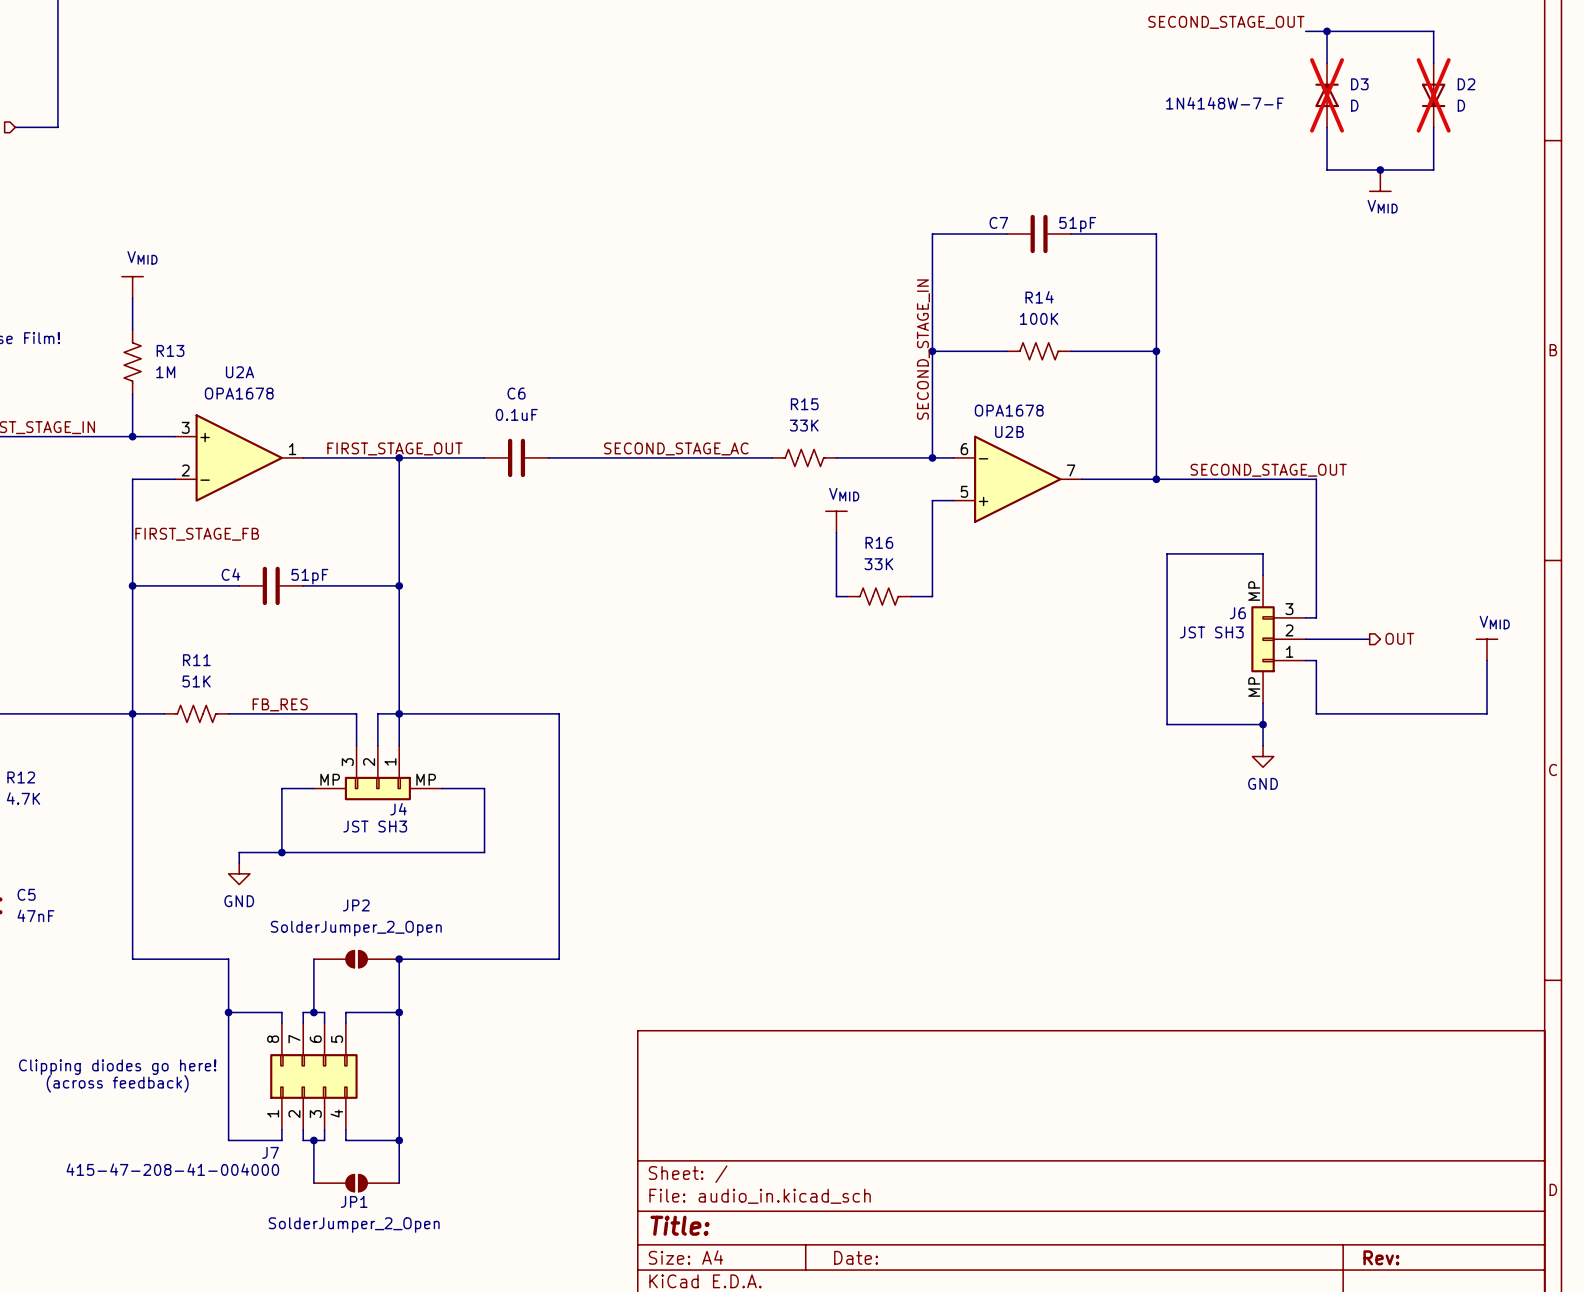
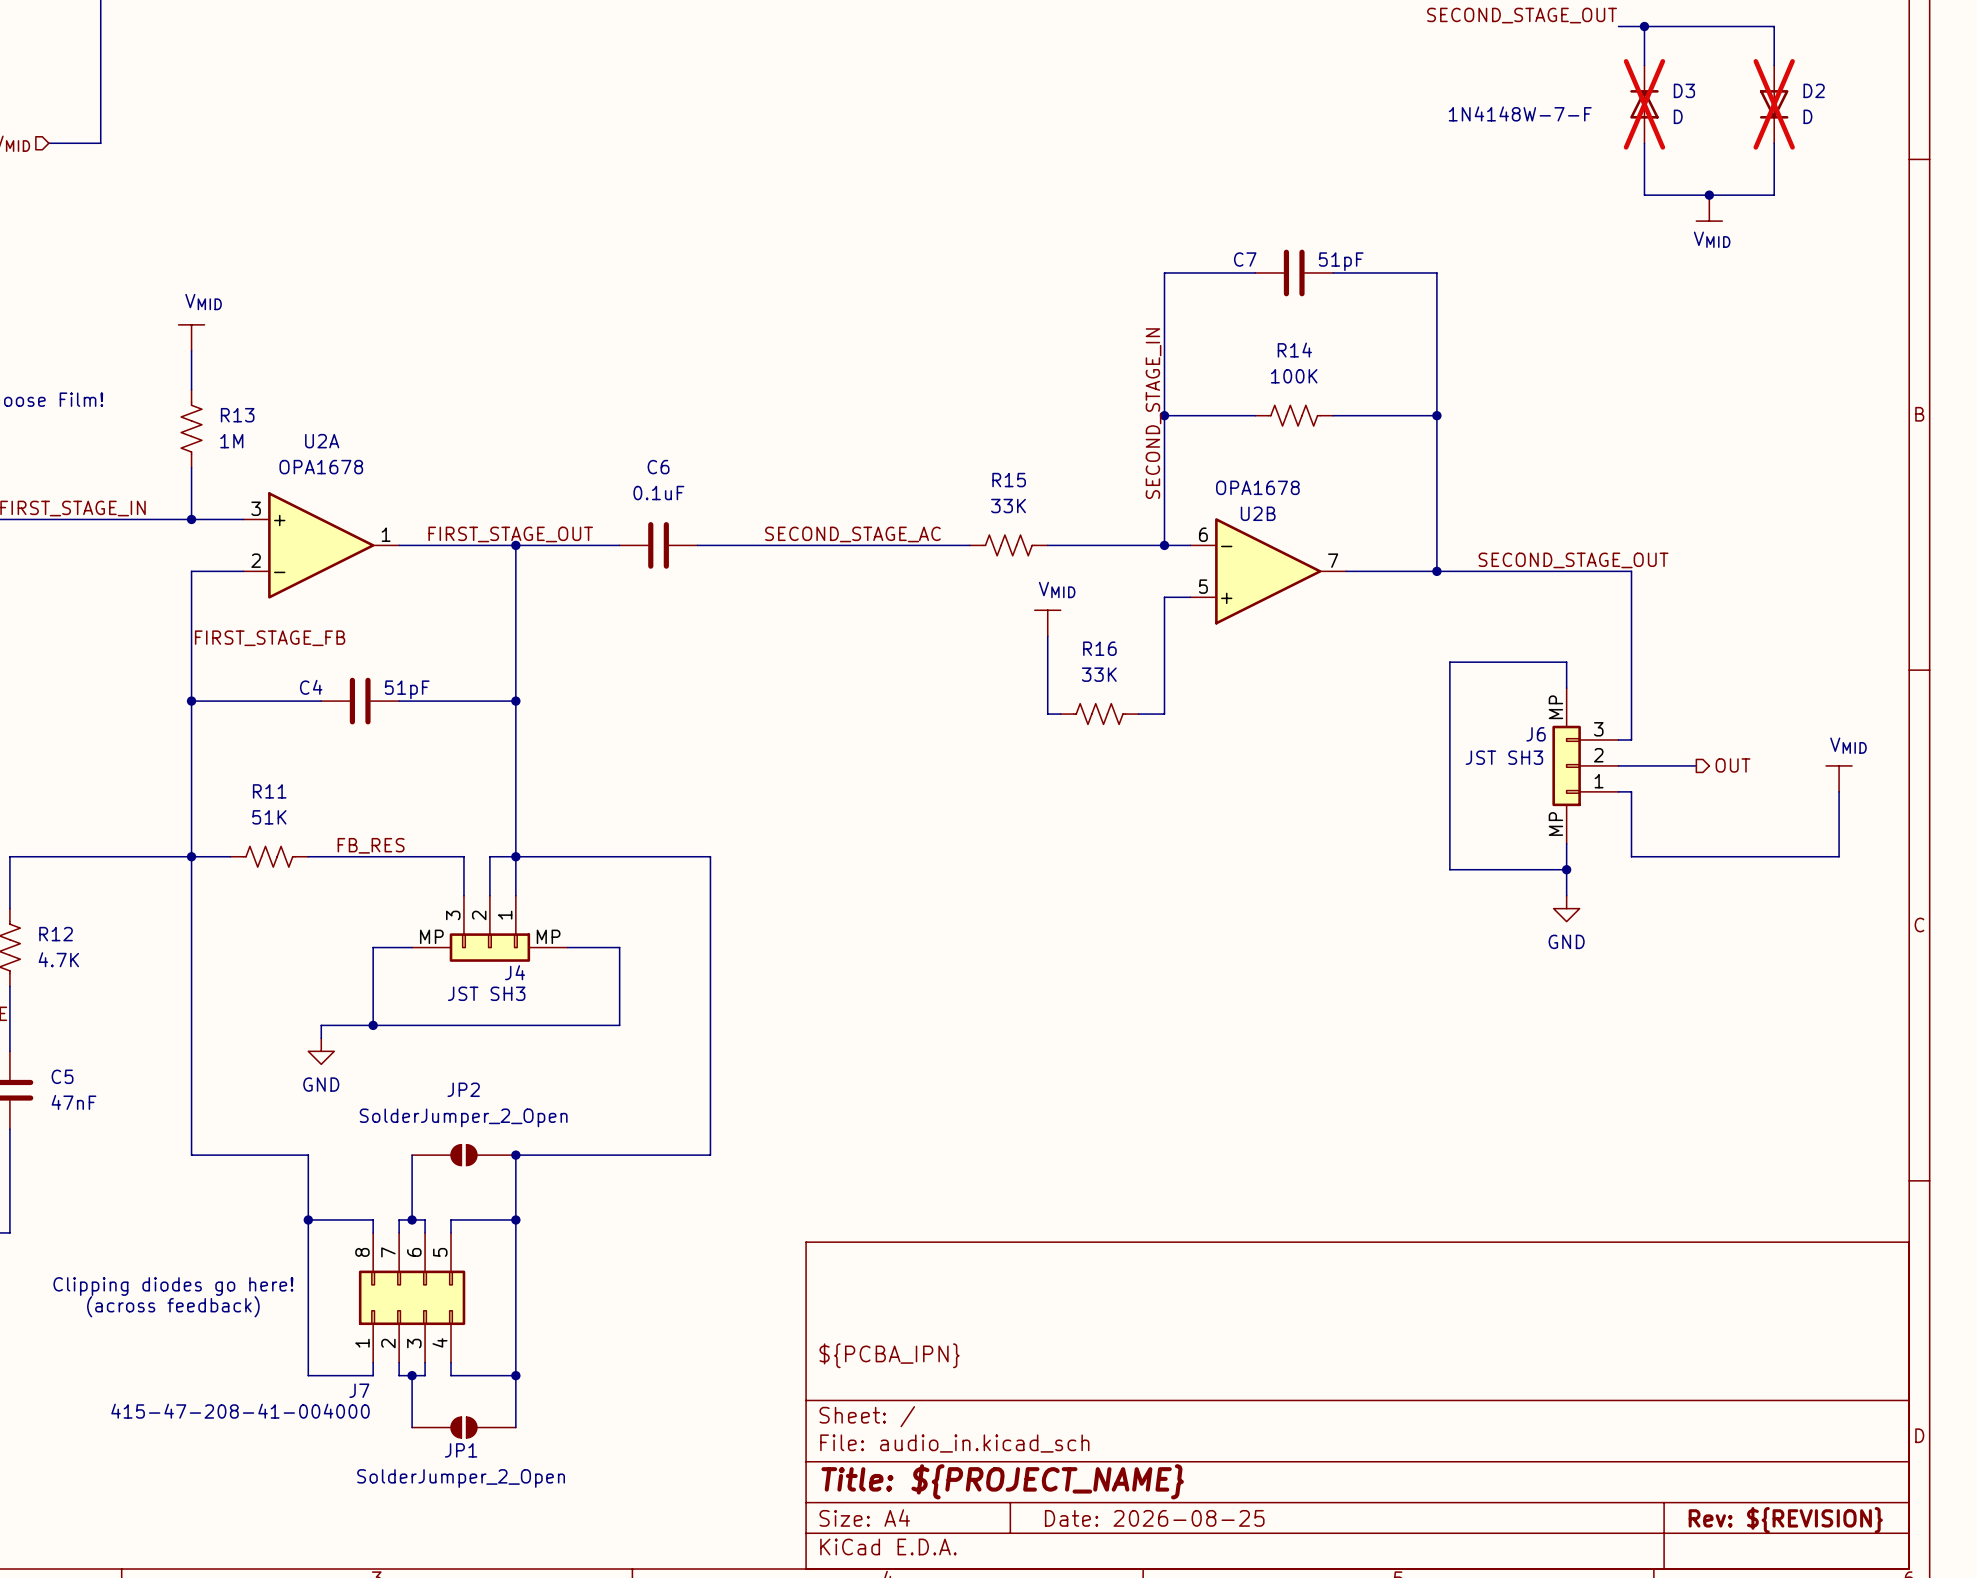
title block: none -> ${PCBA_IPN} (889, 1355)
title block: Title: (680, 1225) -> Title: ${PROJECT_NAME} (1002, 1481)
title block: Date: (856, 1257) -> Date: 2026-08-25 (1154, 1518)
title block: Rev: (1381, 1257) -> Rev: ${REVISION} (1785, 1520)

